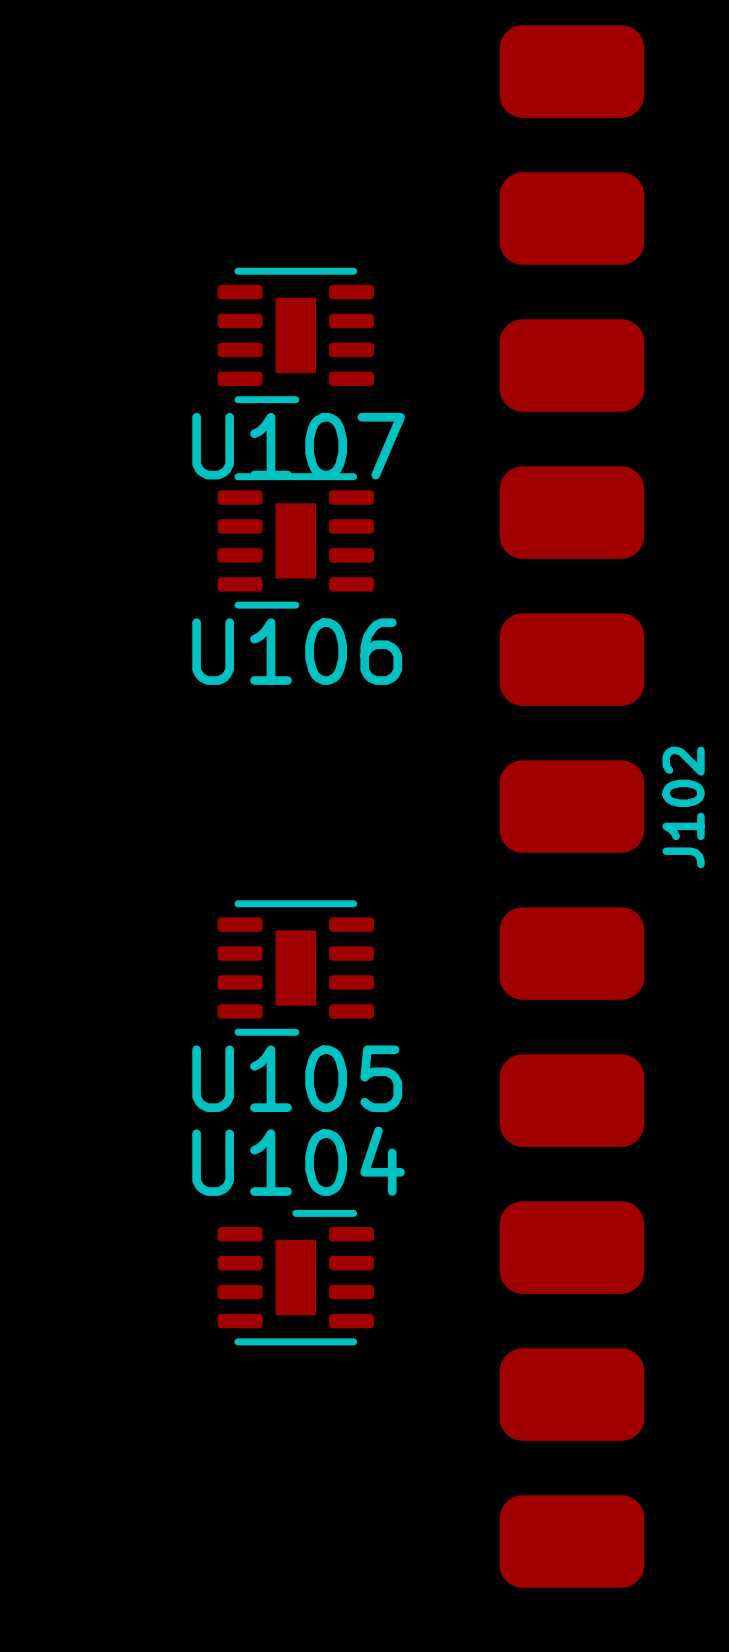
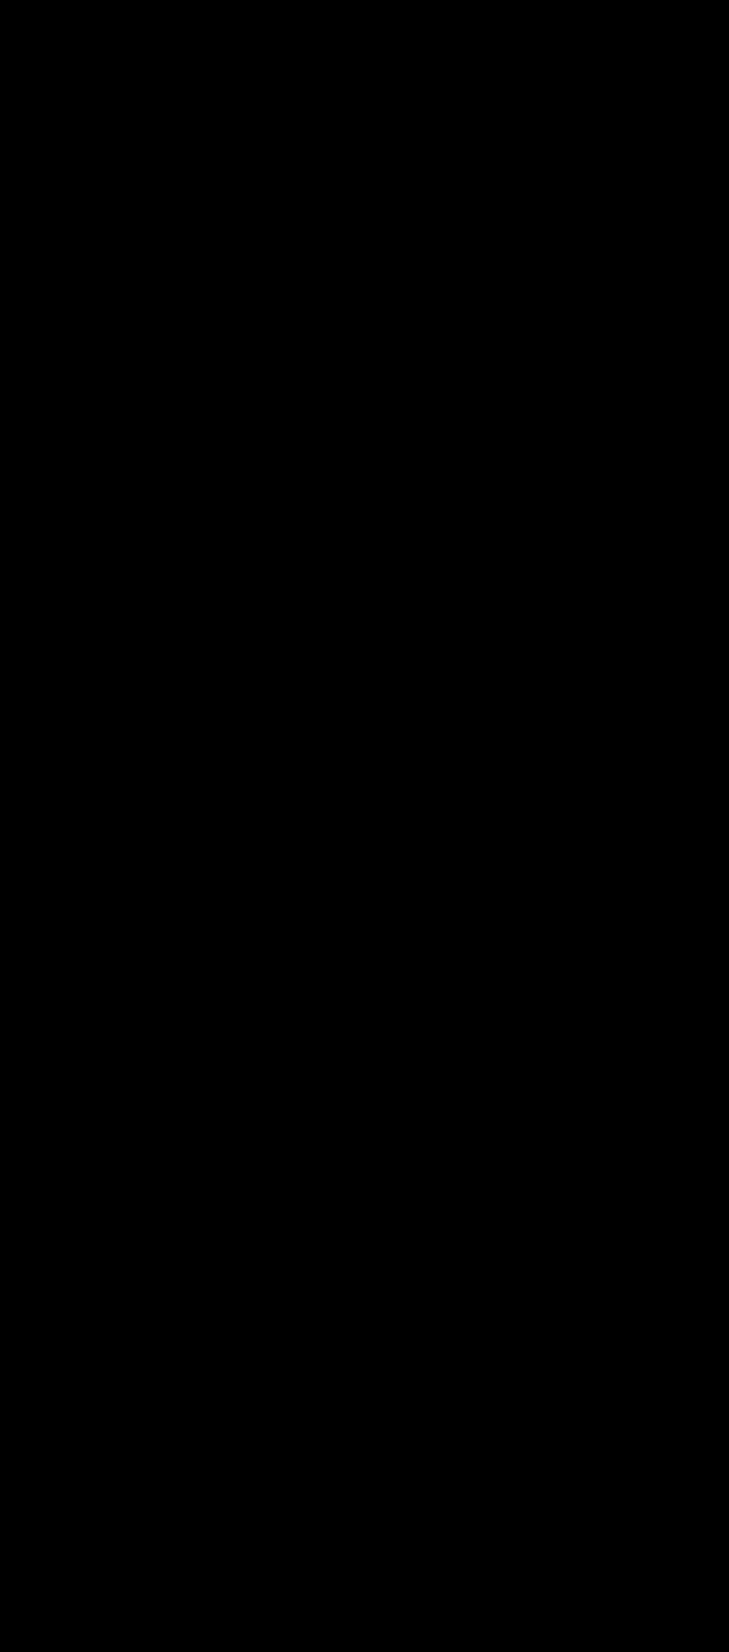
U107: (295, 335) -> none
U106: (295, 540) -> none
J102: (572, 806) -> none
U105: (295, 968) -> none
U104: (295, 1277) -> none

